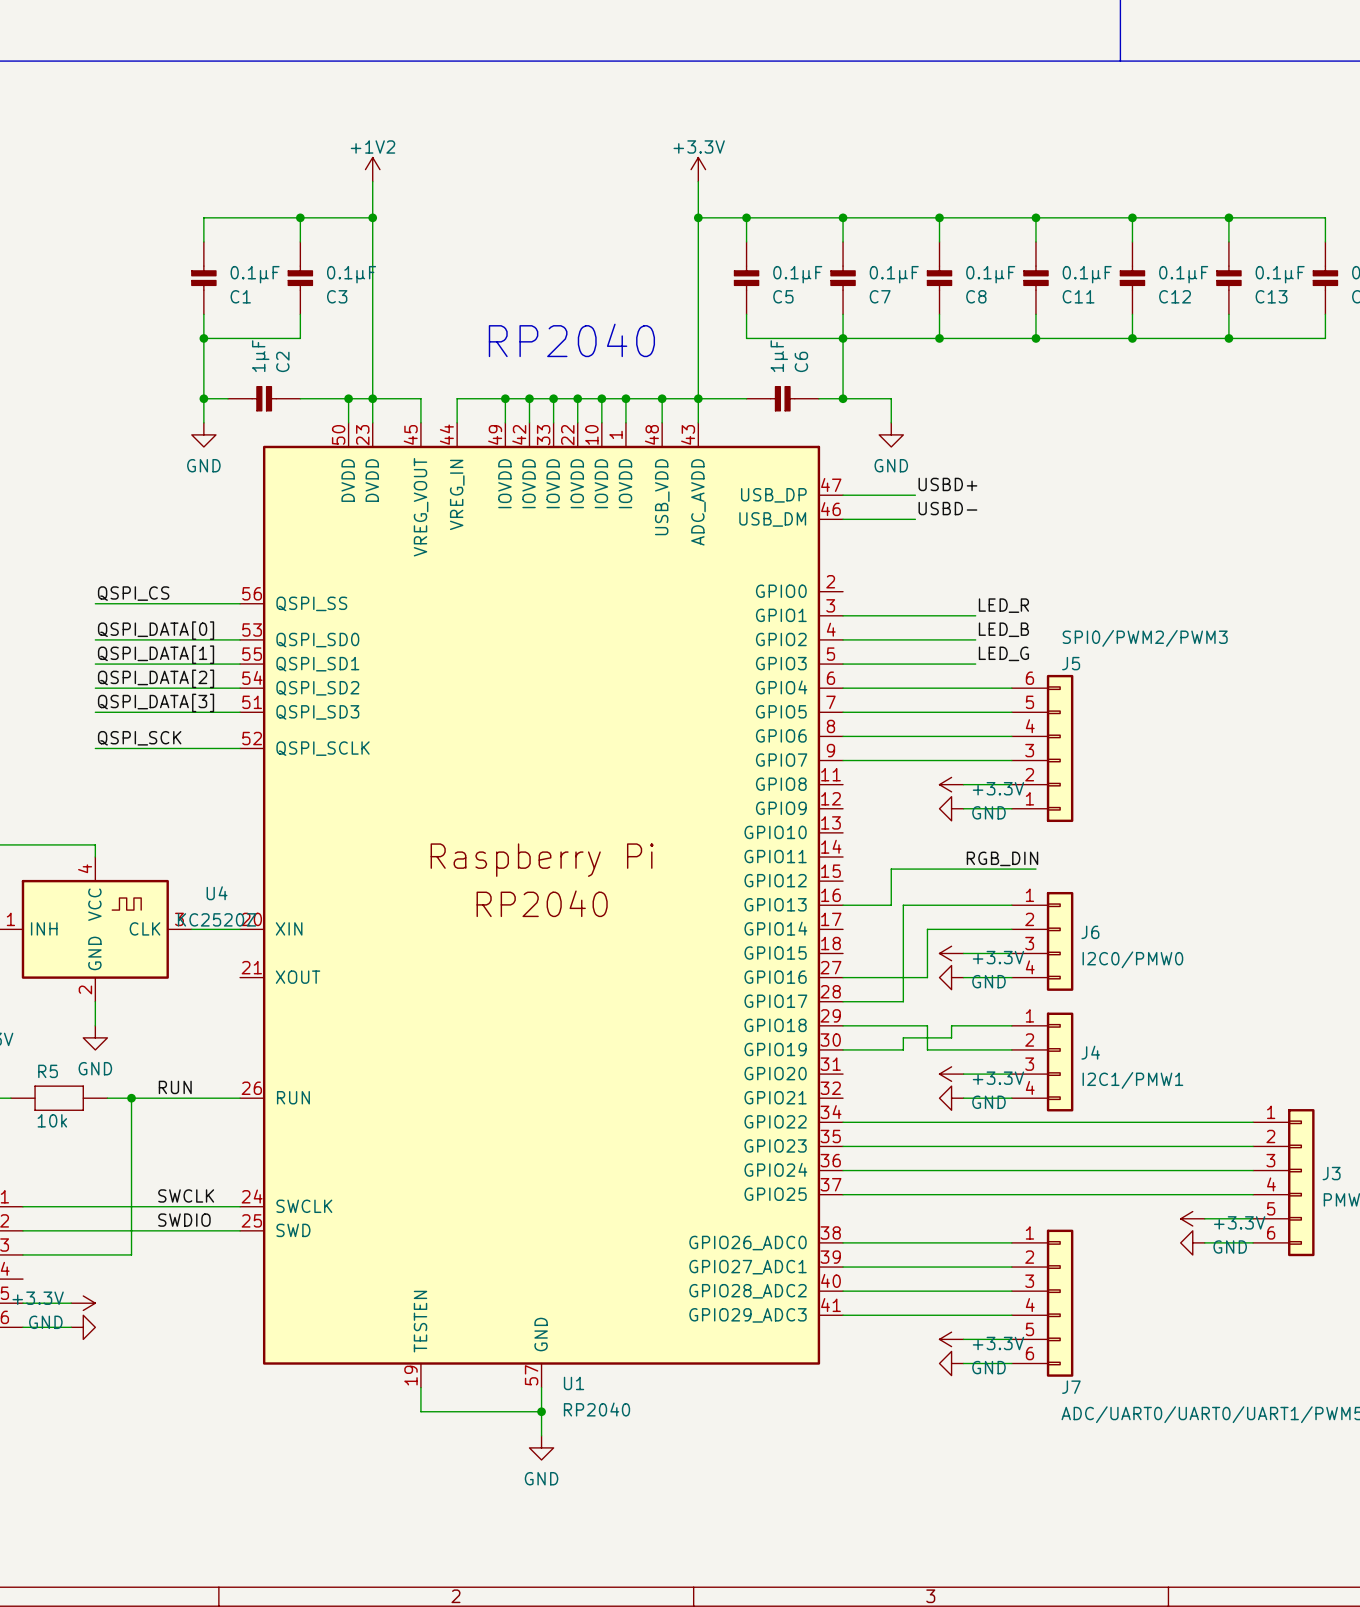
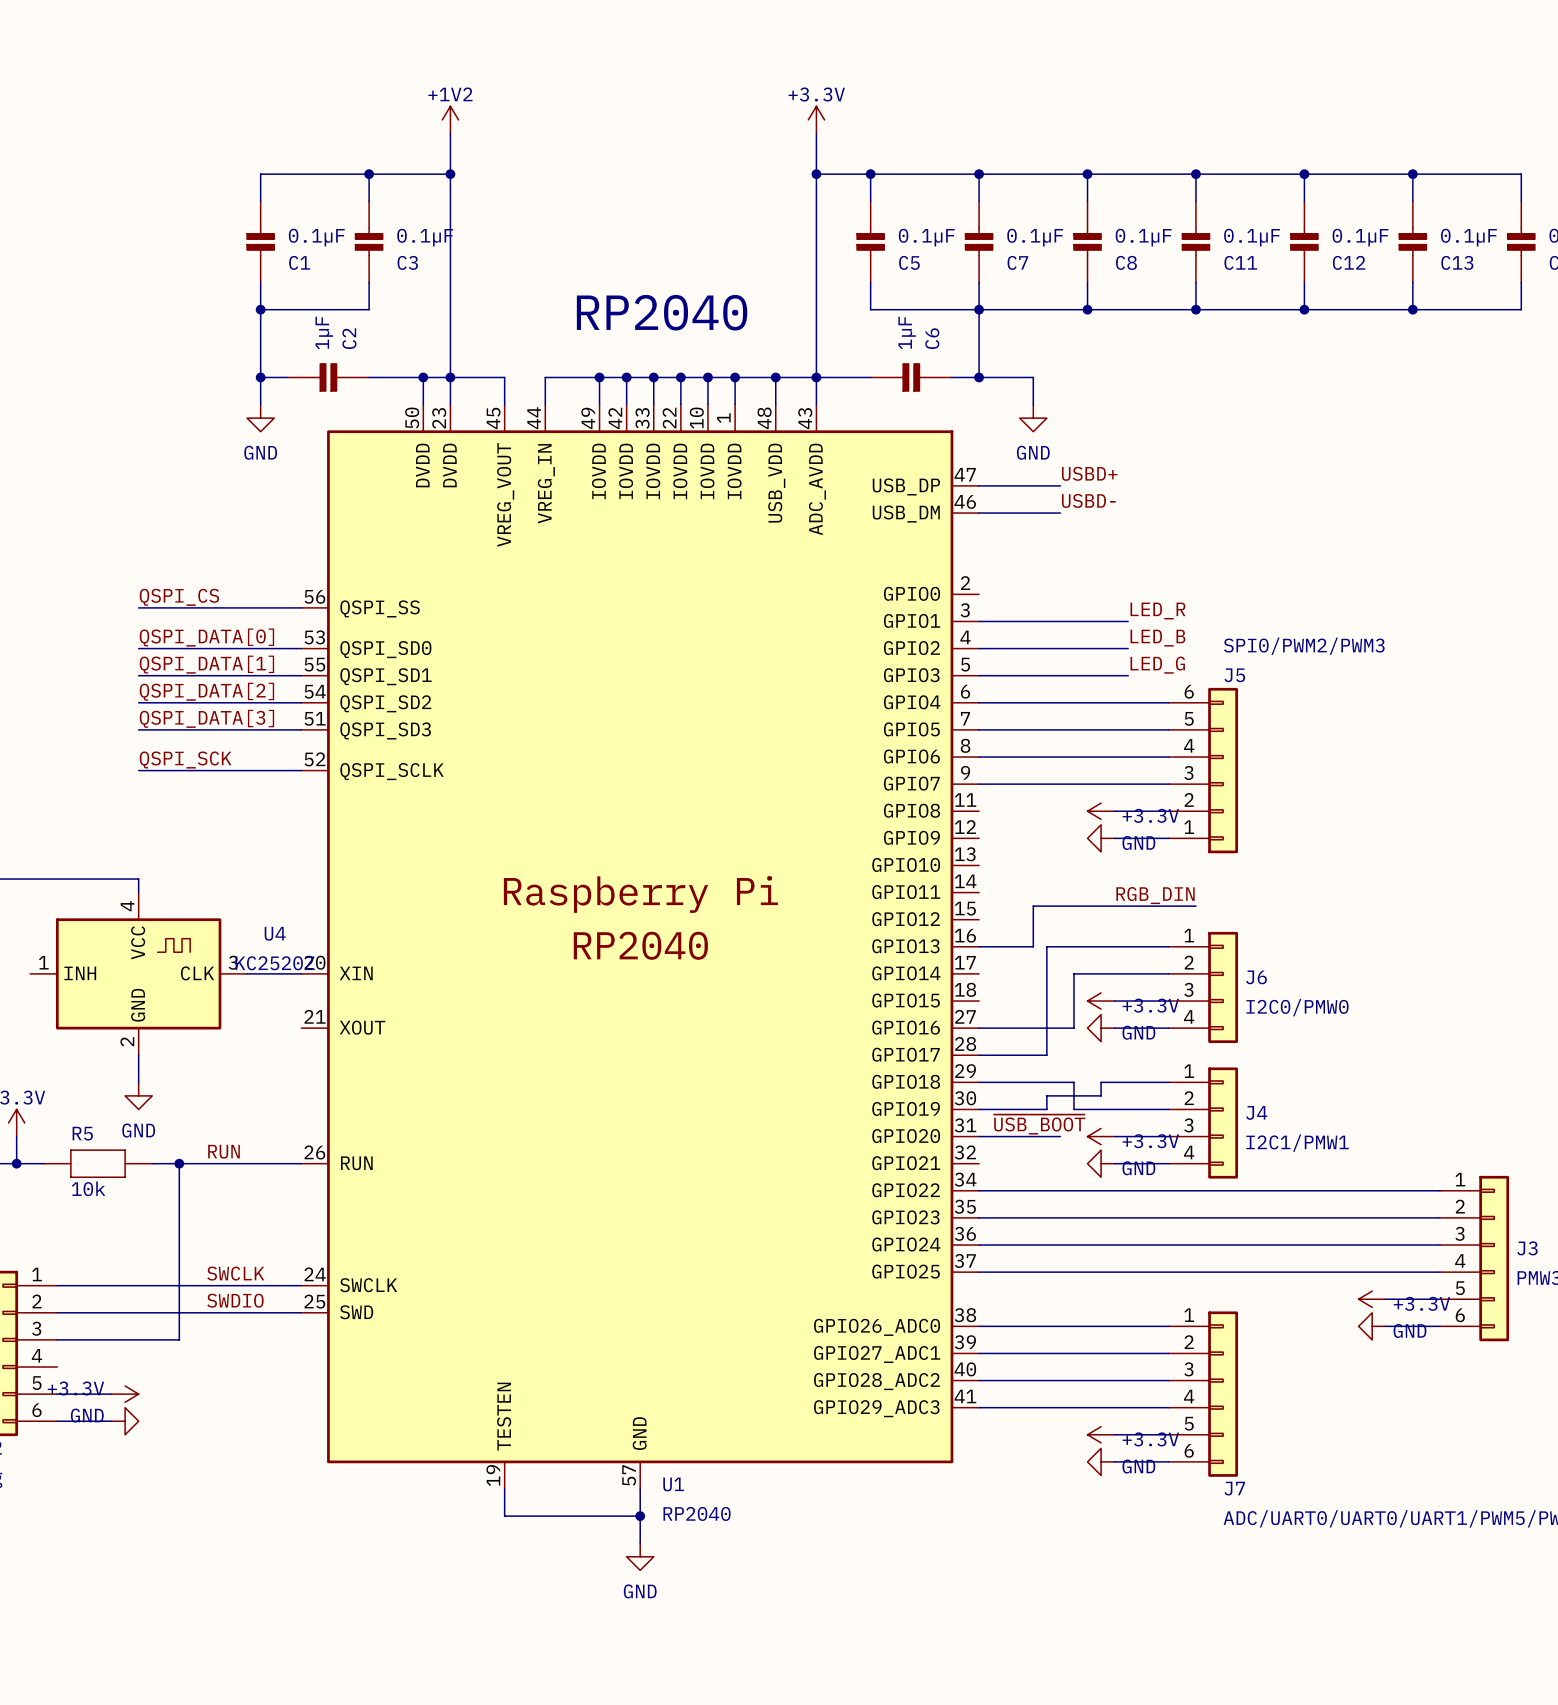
label: none -> ~{USB_BOOT} (1039, 1124)
wire: none -> (979, 1136) (1060, 1136)

